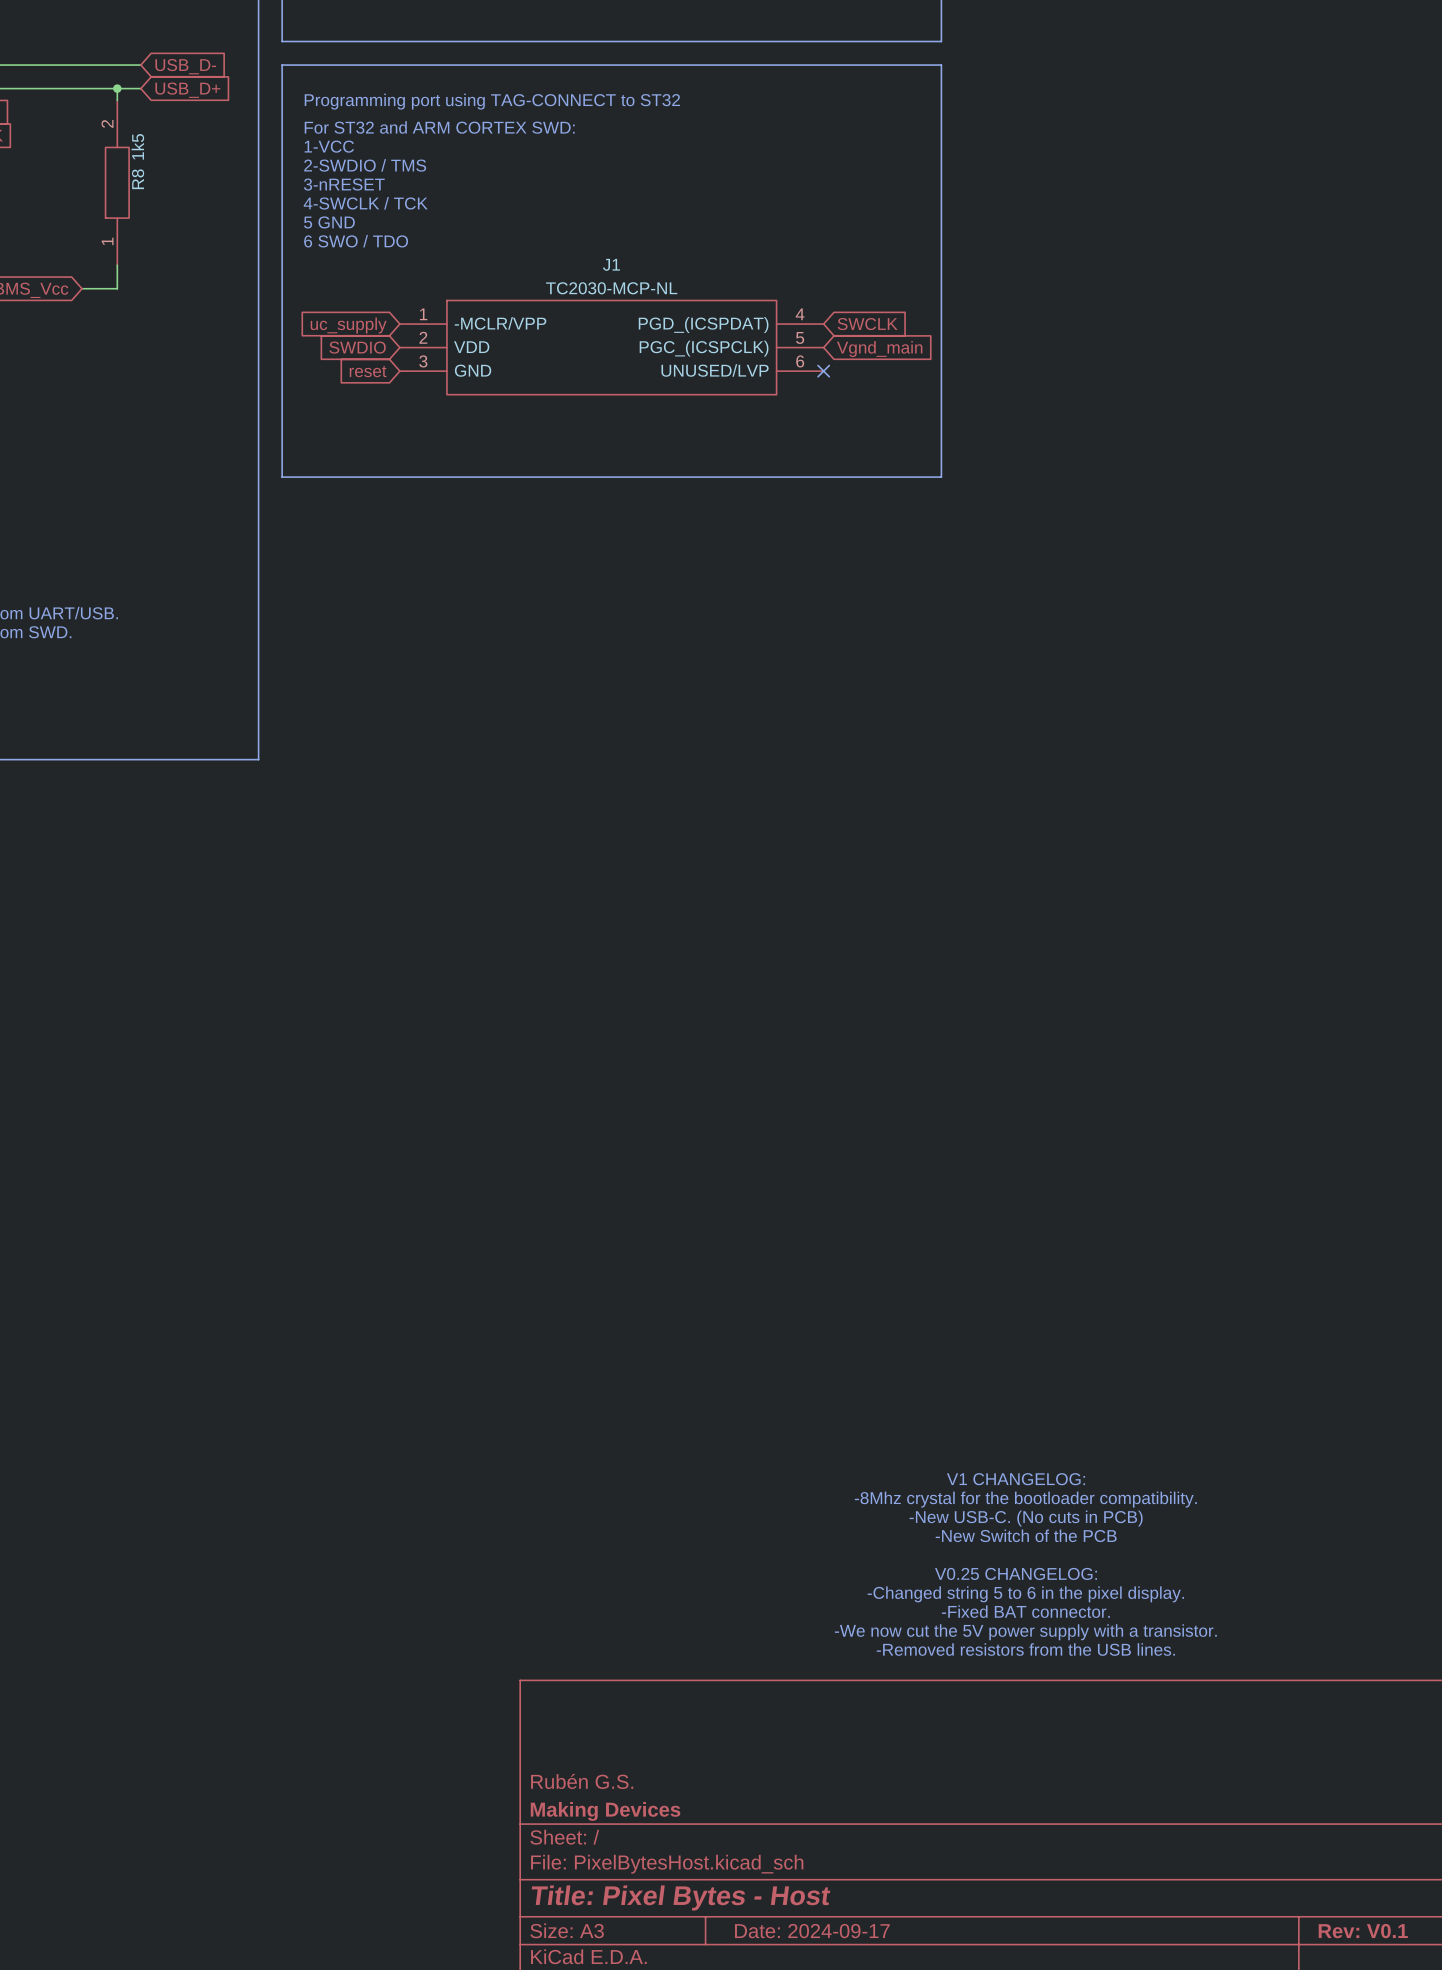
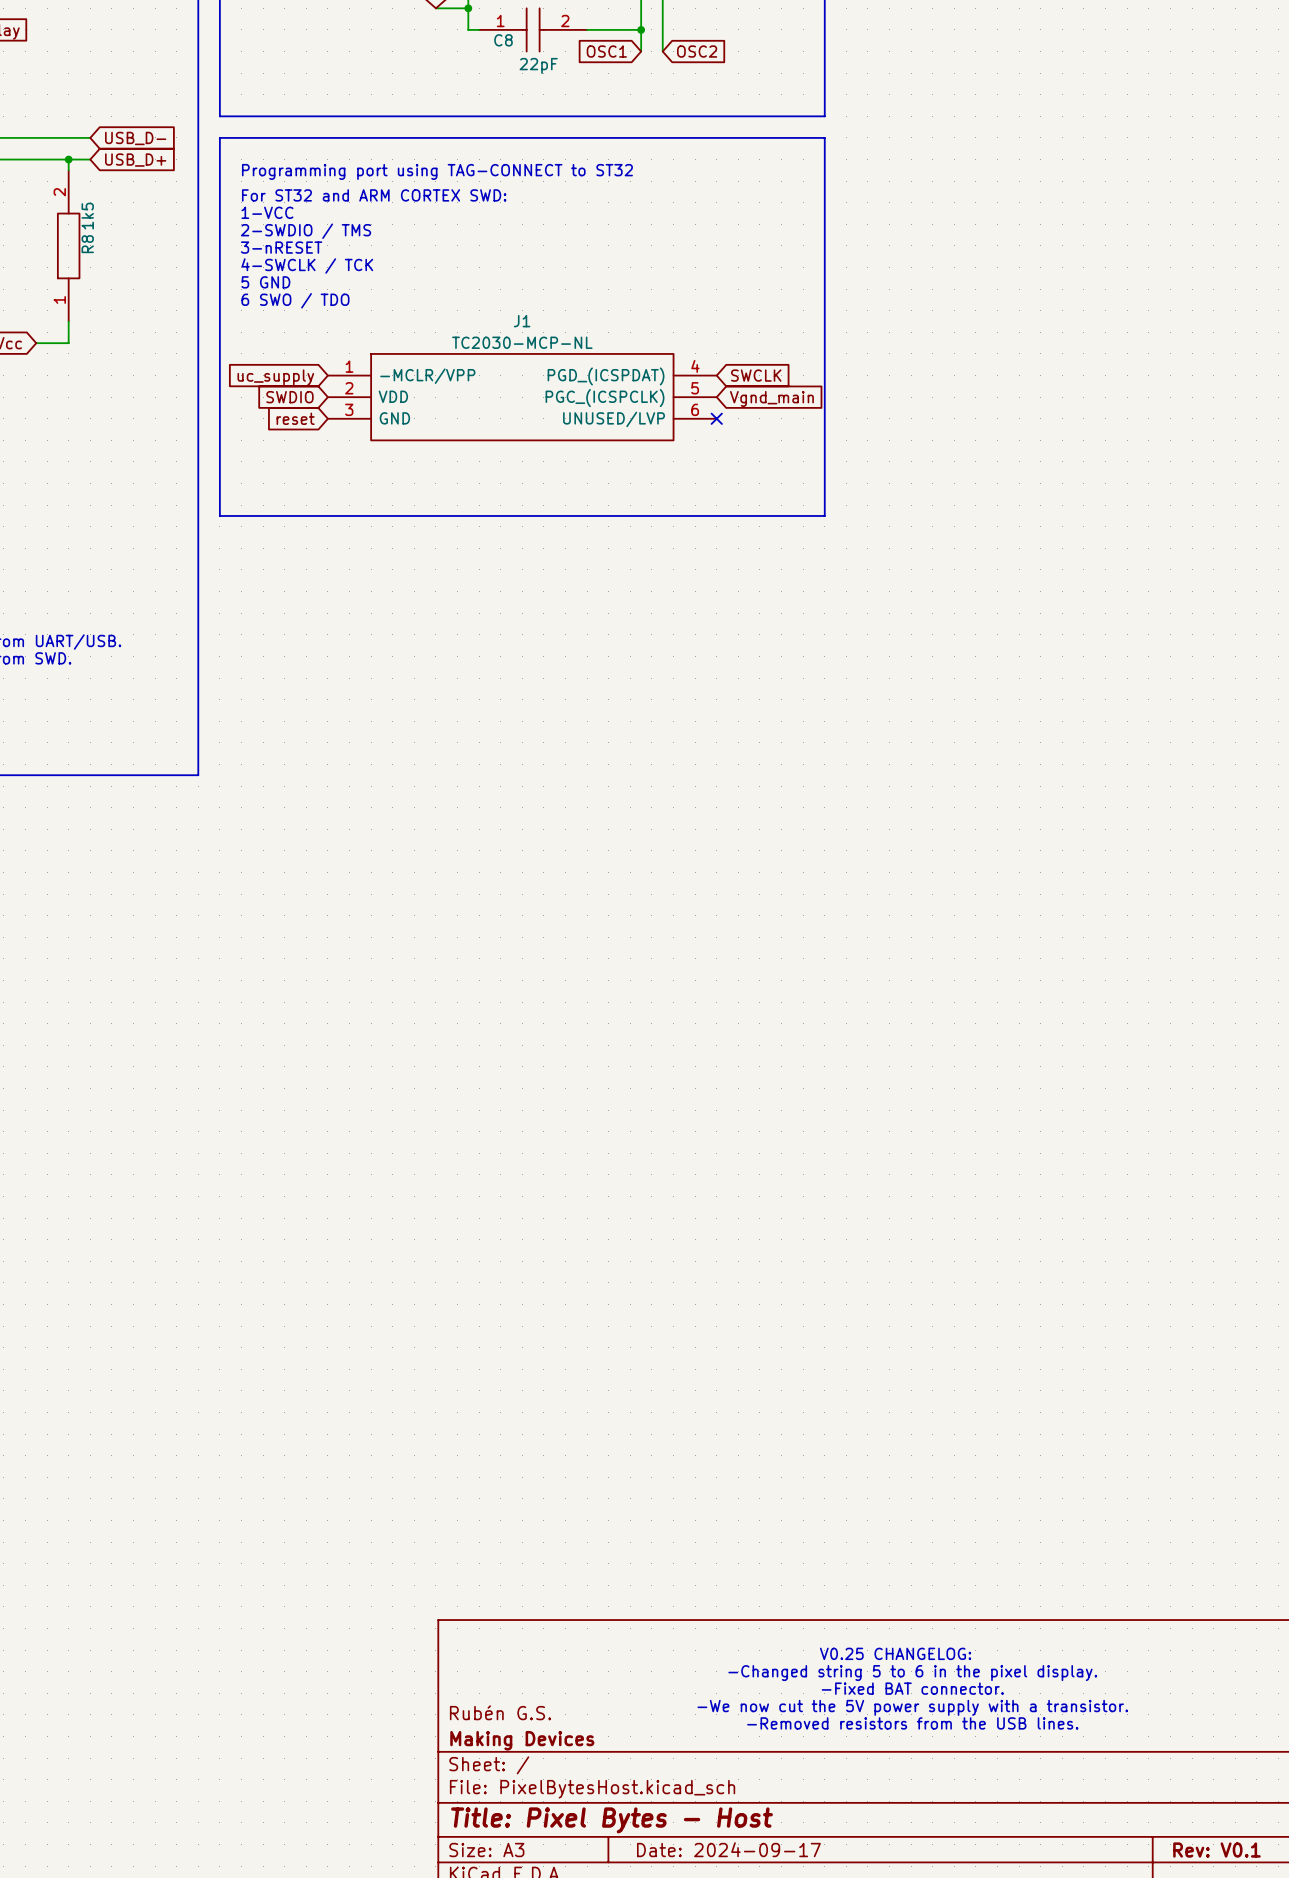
text: V1 CHANGELOG: (1016, 1479) -> none
text: -8Mhz crystal for the bootloader compatibility. (1025, 1499) -> none
text: -New USB-C. (No cuts in PCB) (1026, 1518) -> none
text: -New Switch of the PCB (1026, 1535) -> none
text position: V0.25 CHANGELOG: (1016, 1573) -> V0.25 CHANGELOG: (895, 1653)
text position: -Changed string 5 to 6 in the pixel display. (1025, 1594) -> -Changed string 5 to 6 in the pixel display. (912, 1673)
text position: -Fixed BAT connector. (1025, 1611) -> -Fixed BAT connector. (912, 1688)
text position: -We now cut the 5V power supply with a transistor. (1025, 1632) -> -We now cut the 5V power supply with a transistor. (912, 1707)
text position: -Removed resistors from the USB lines. (1025, 1649) -> -Removed resistors from the USB lines. (912, 1723)

